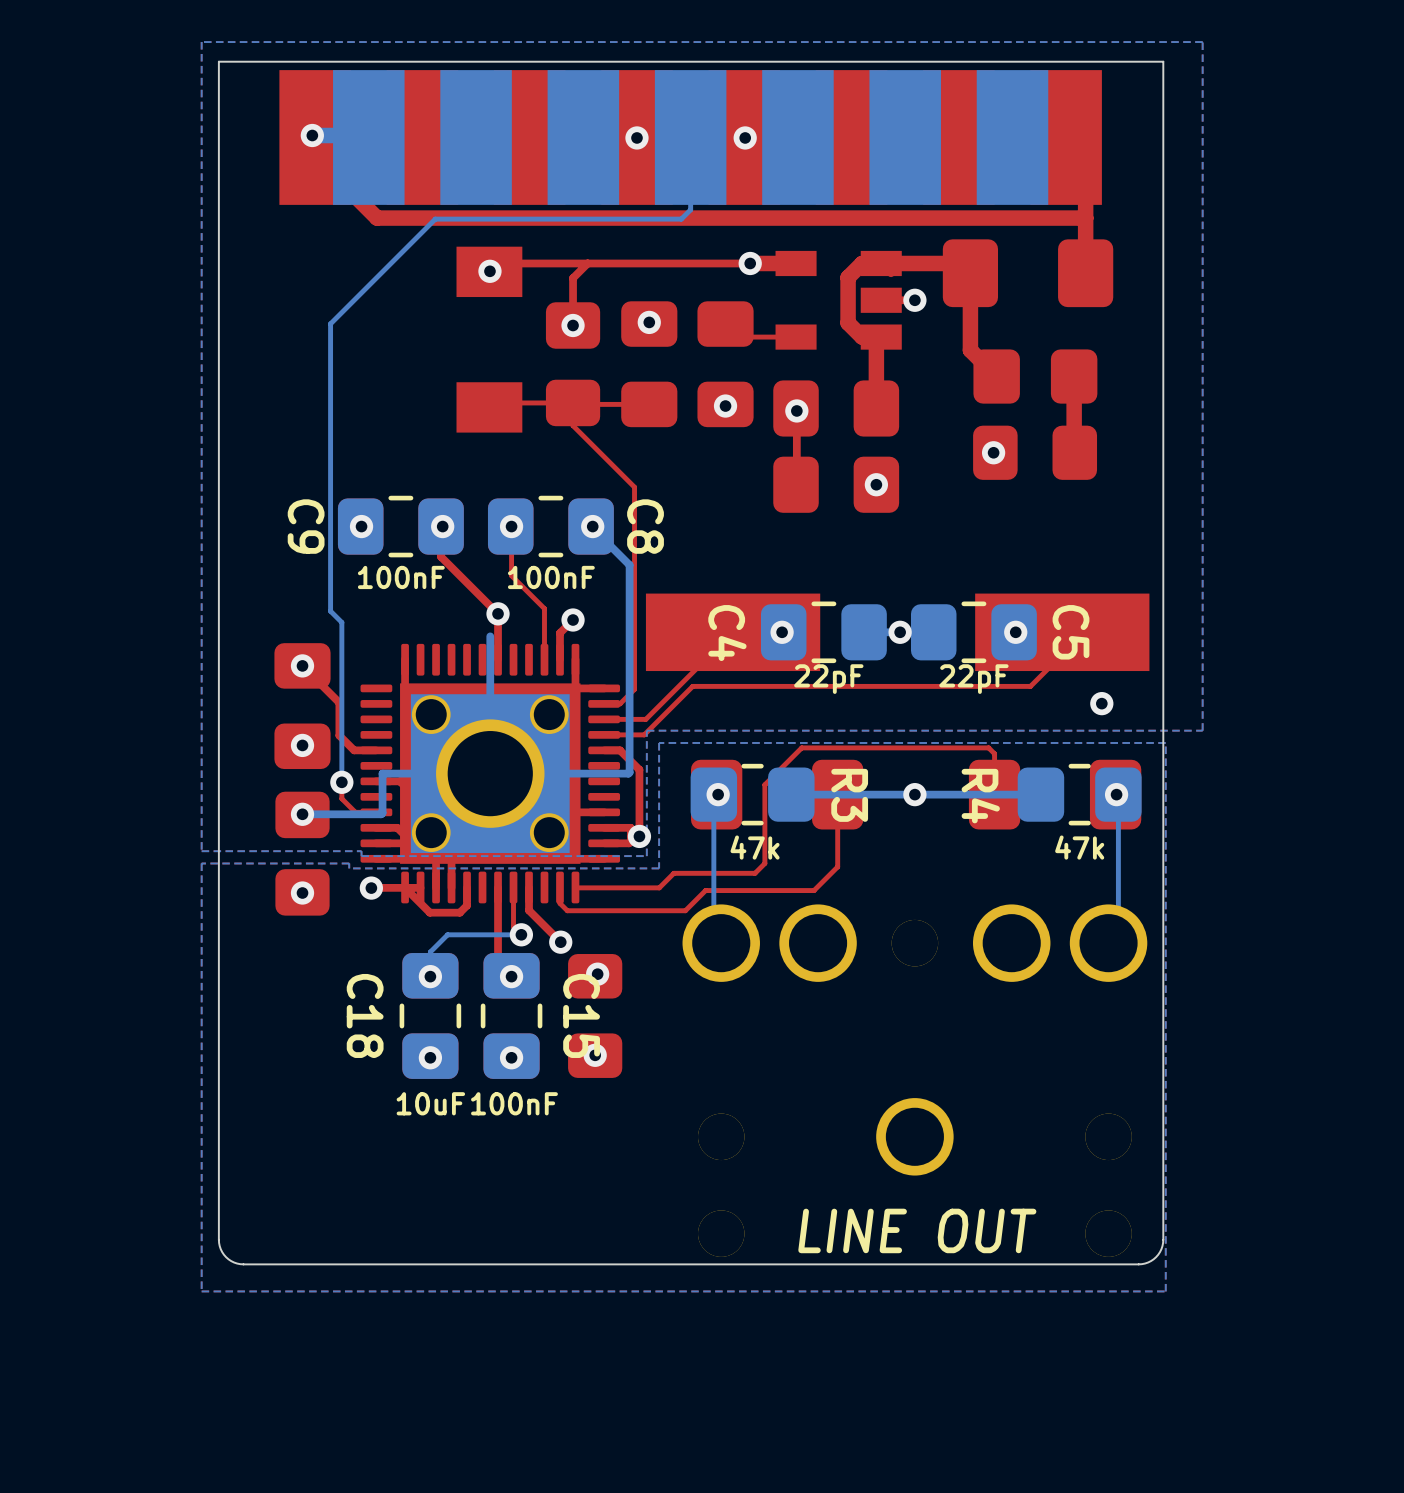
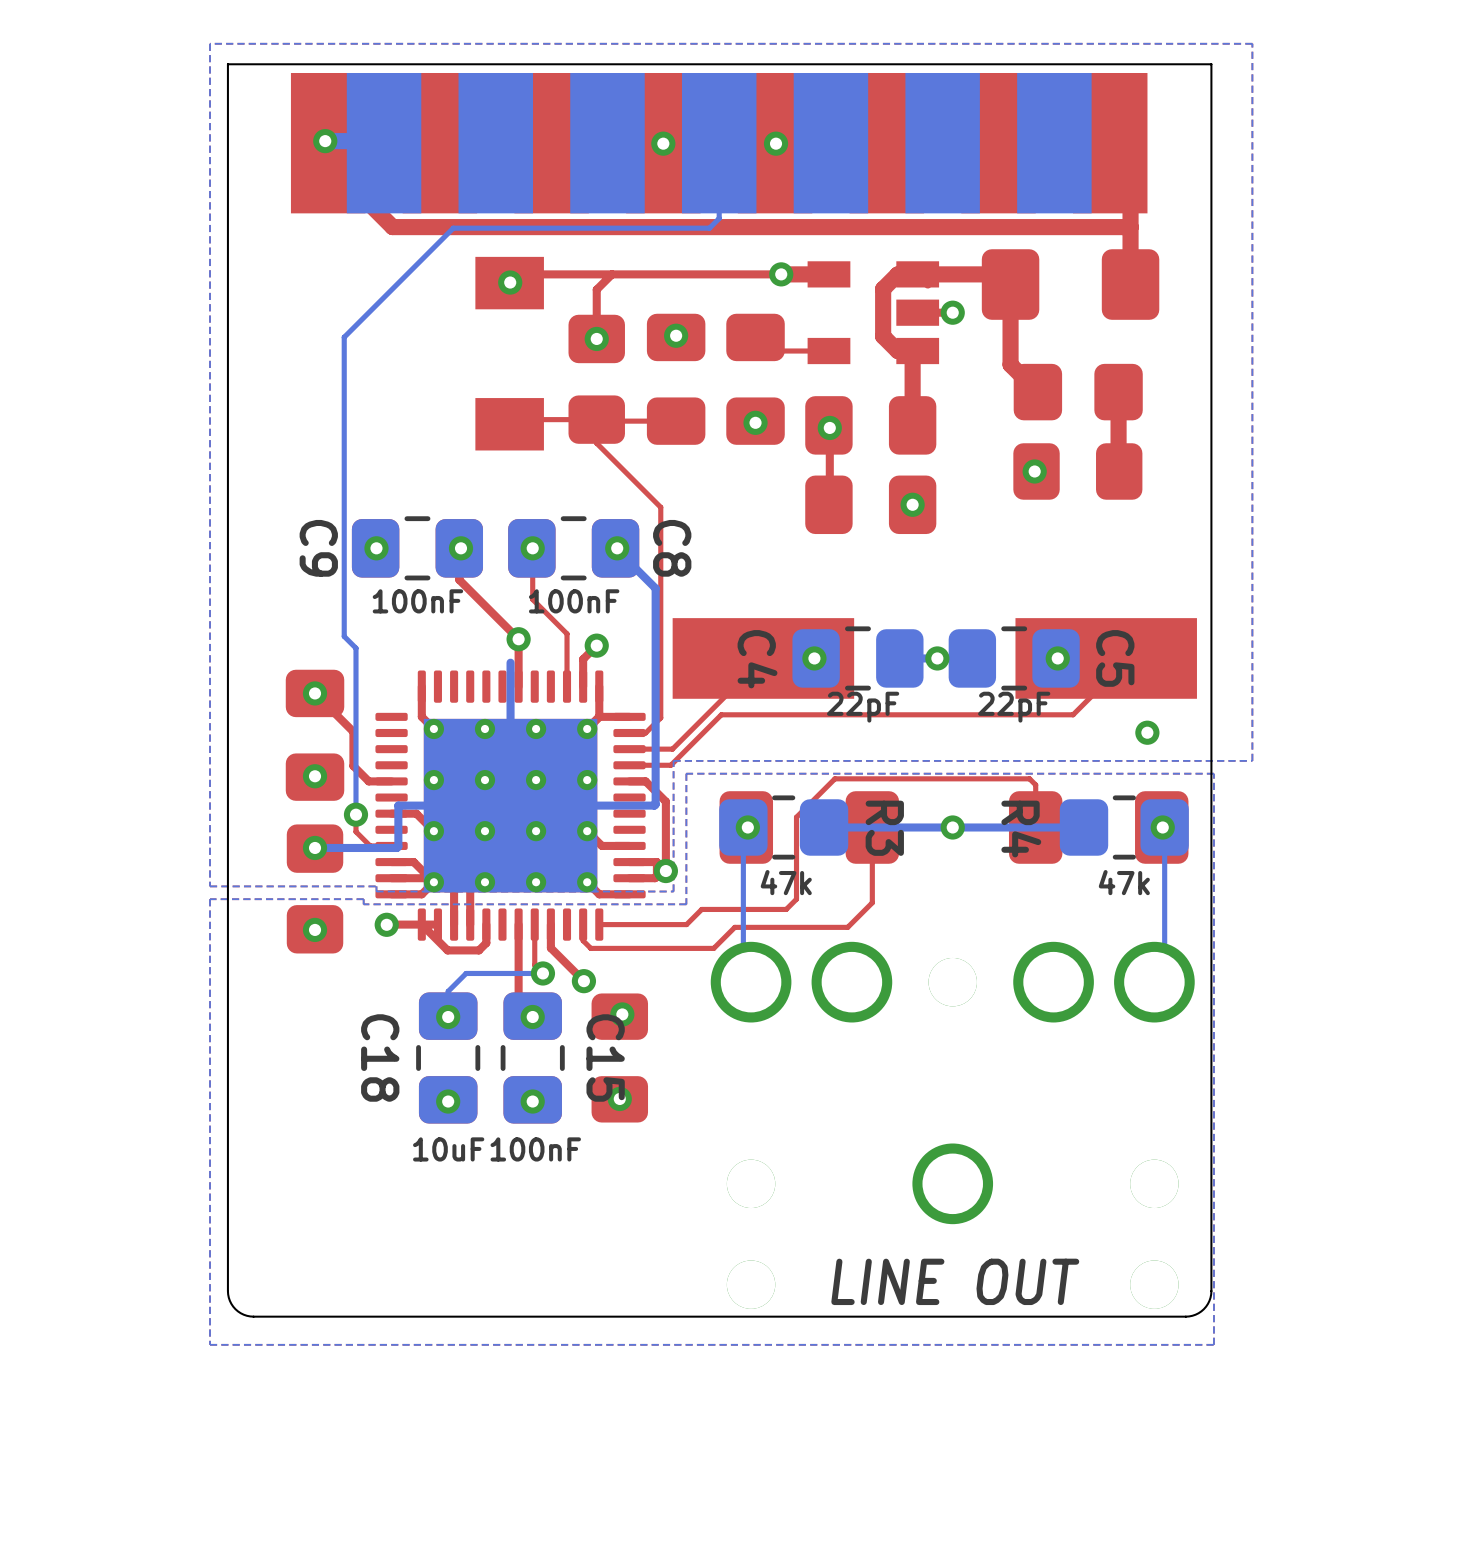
part footprint: [360, 643, 621, 904] -> [375, 670, 646, 941]

